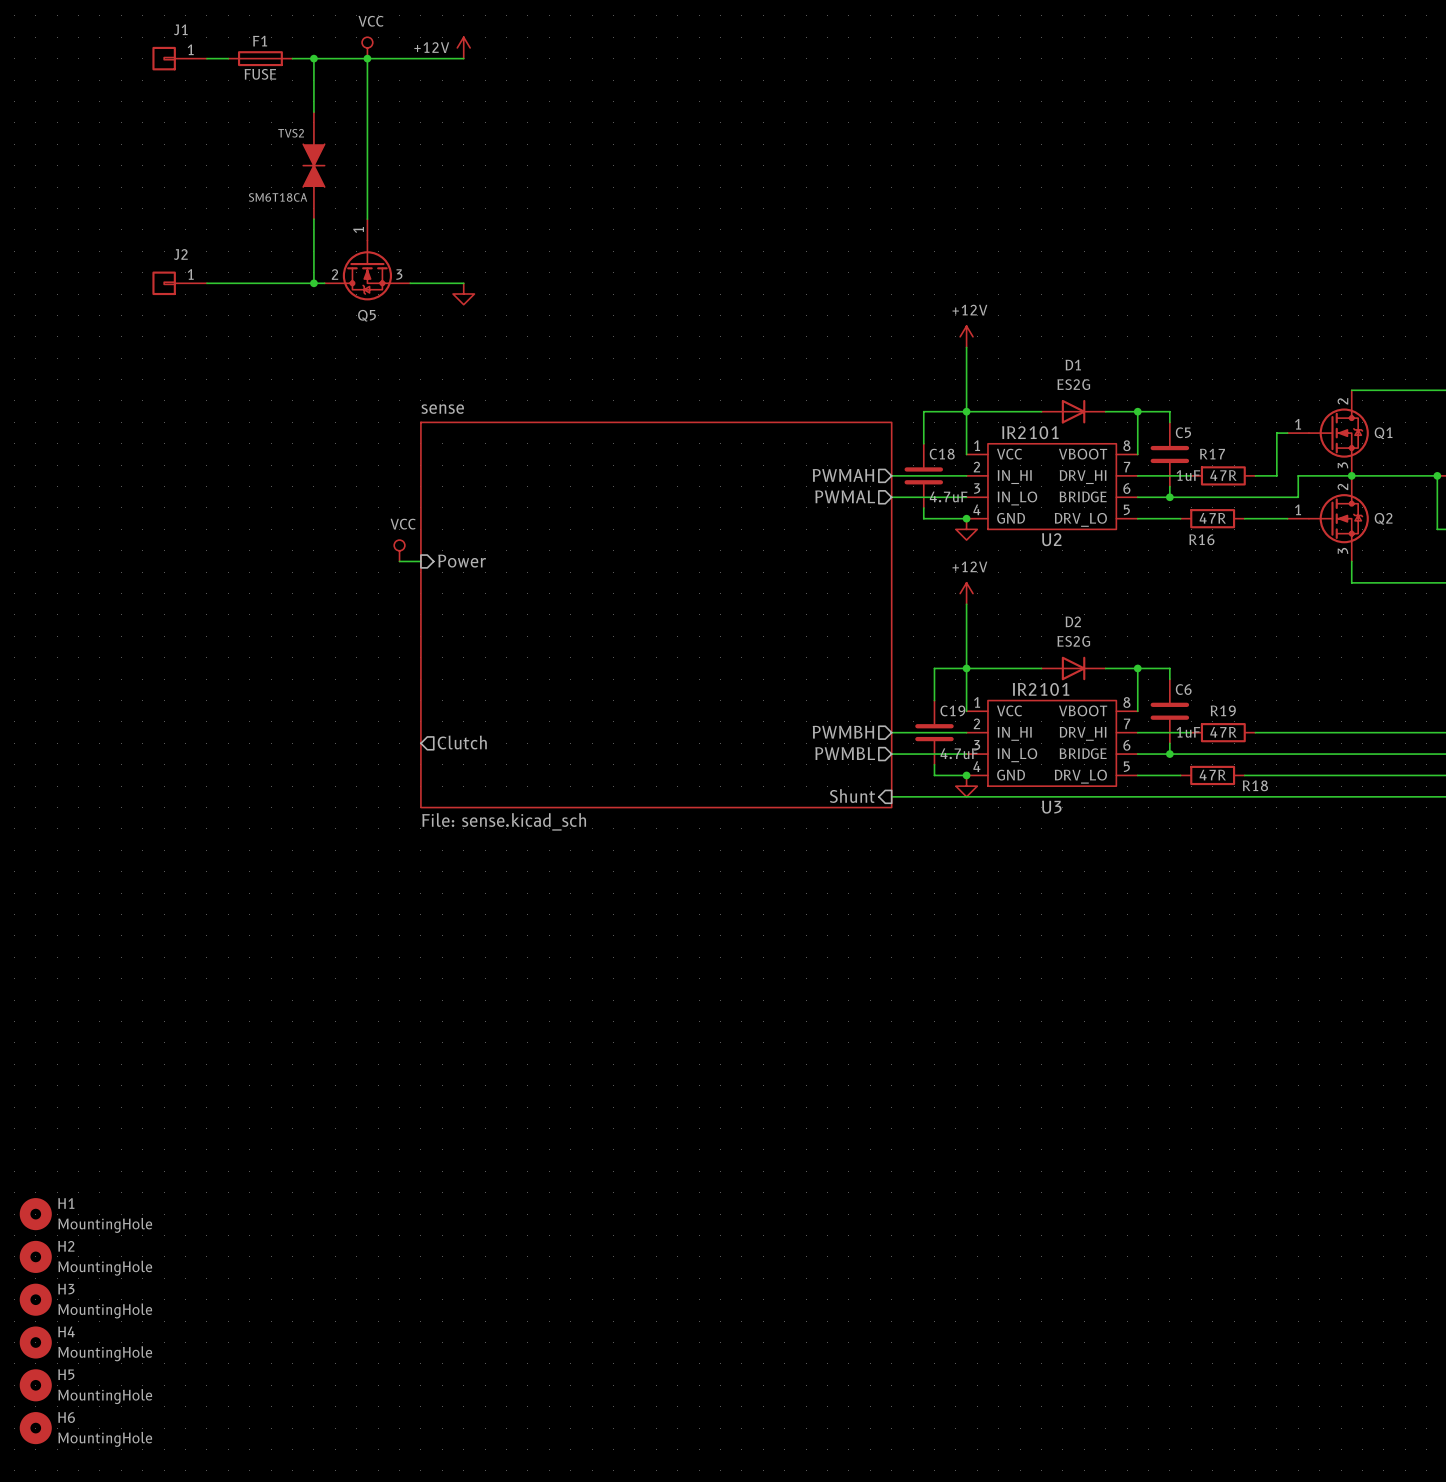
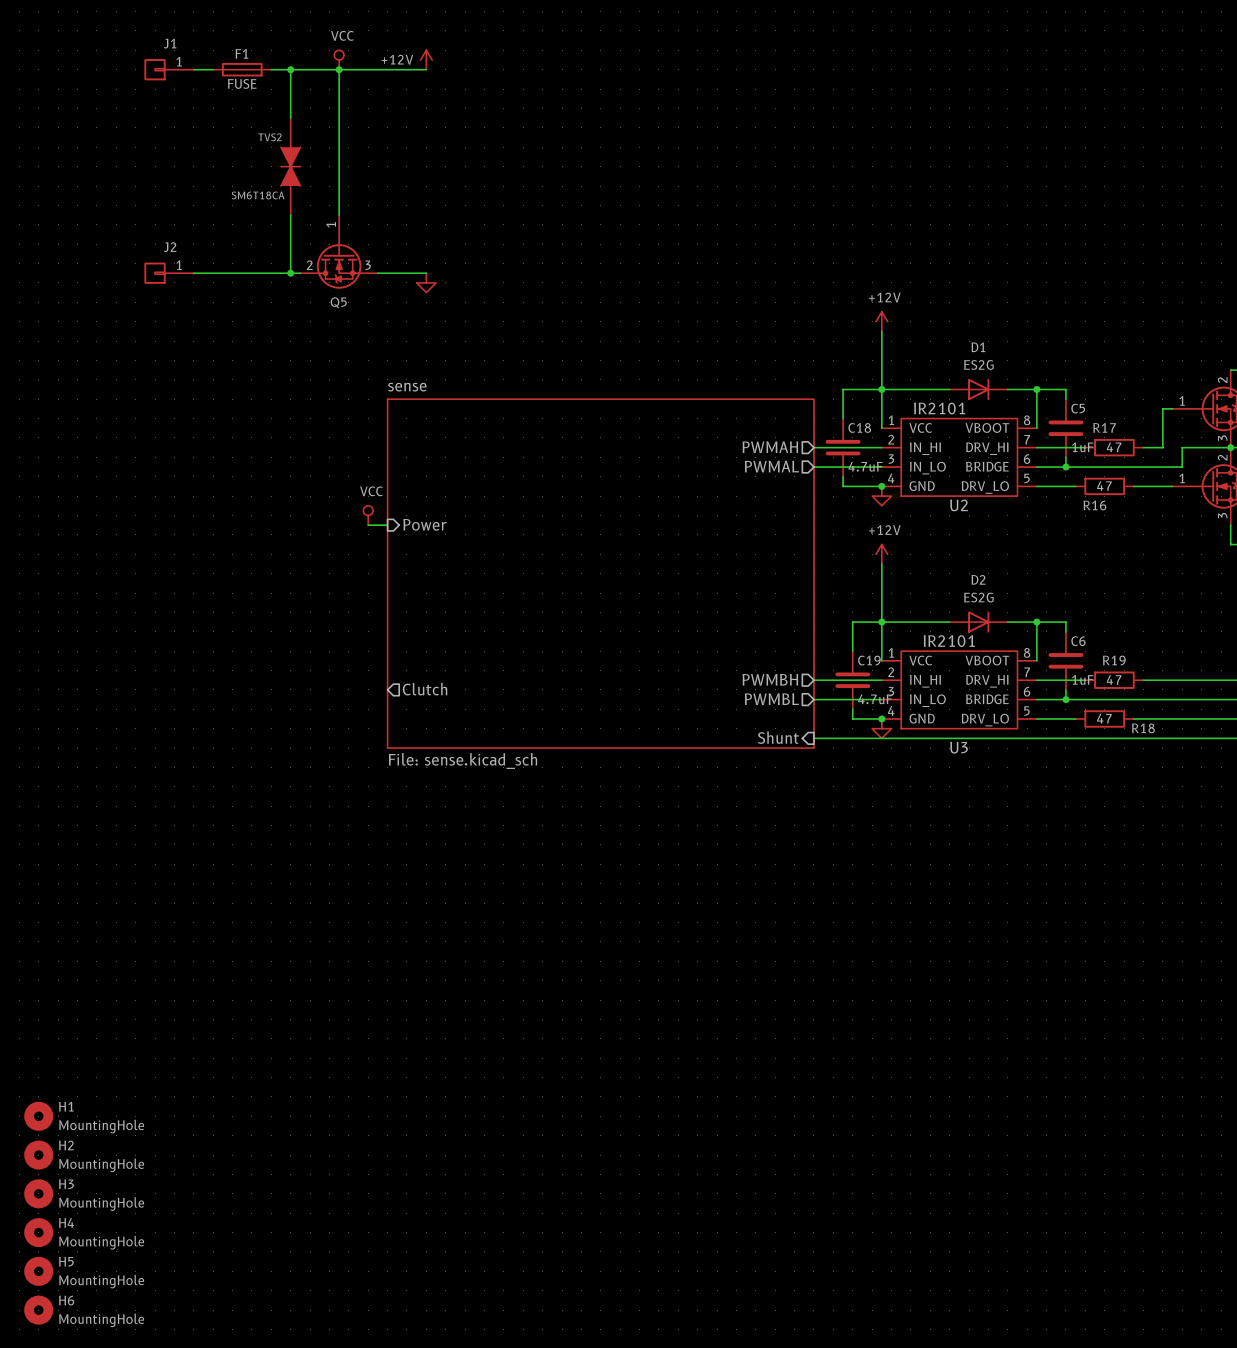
R17 value: 47R (1223, 475) -> 47 (1114, 447)
R16 value: 47R (1212, 518) -> 47 (1104, 486)
R19 value: 47R (1223, 732) -> 47 (1114, 679)
R18 value: 47R (1212, 775) -> 47 (1104, 718)

